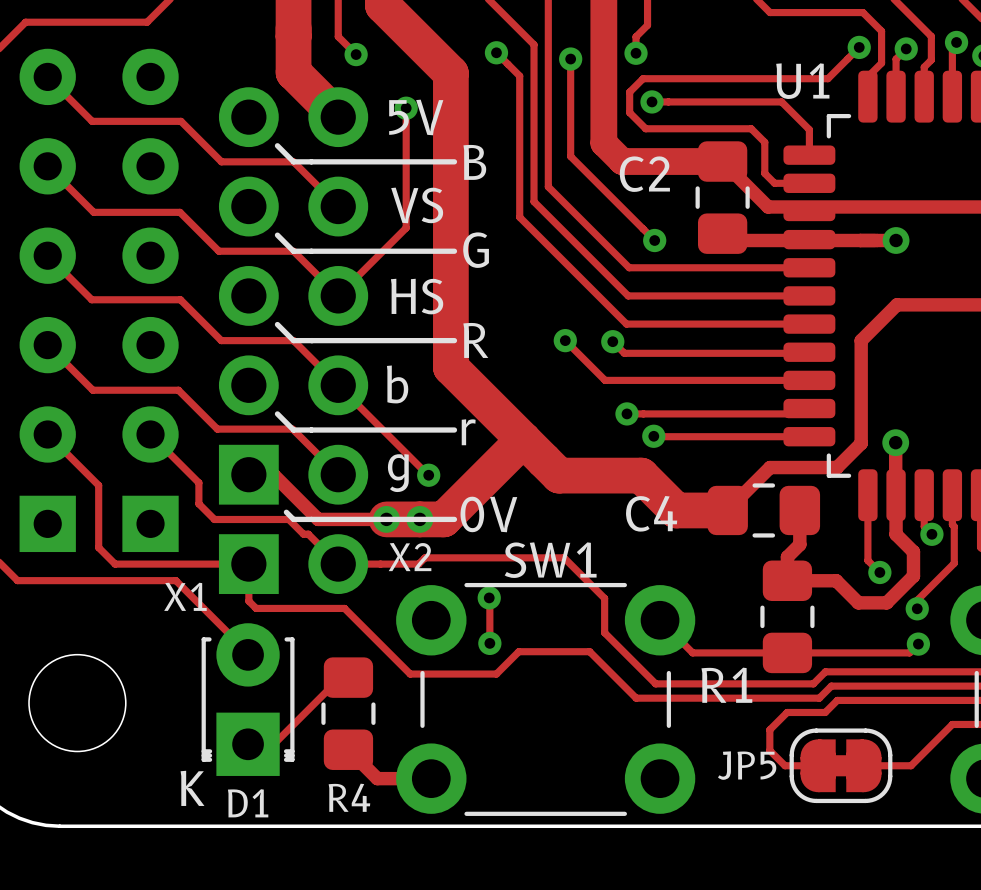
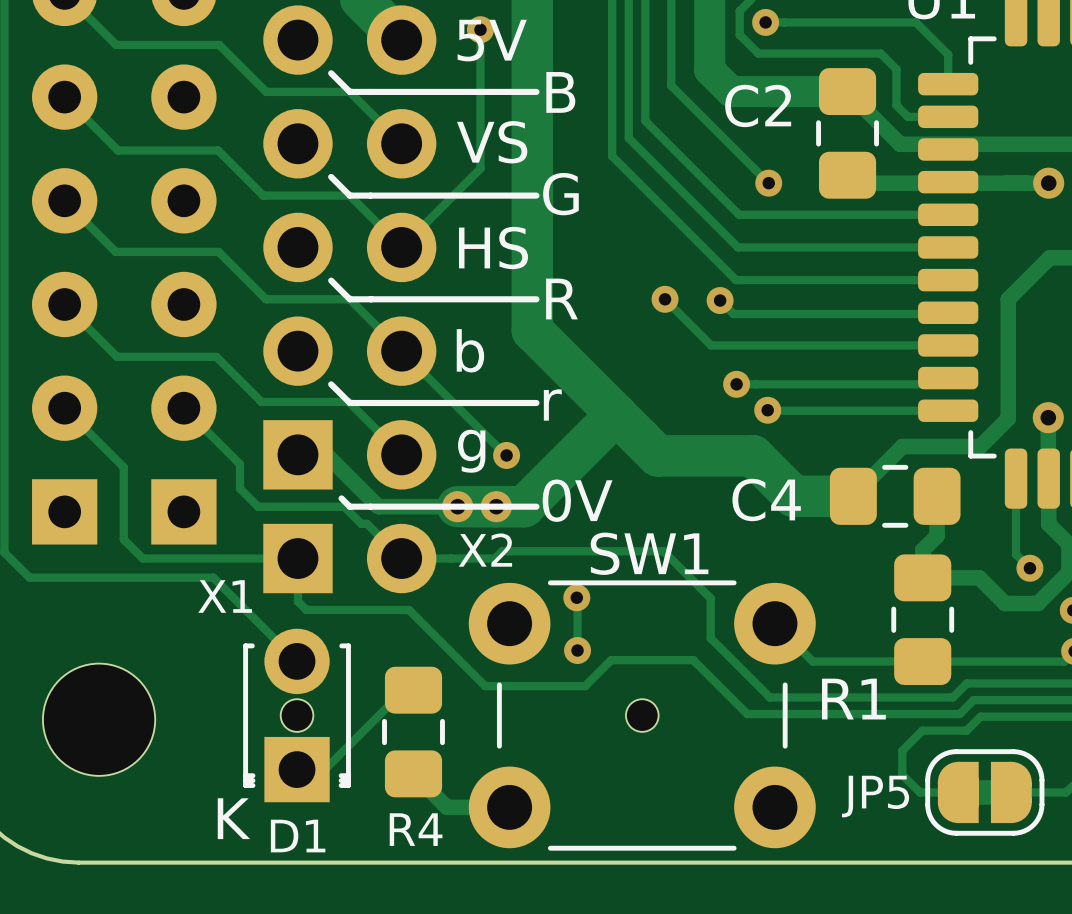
D1 footprint: [201, 623, 295, 776] -> [243, 628, 351, 803]
part: none -> (297, 715)
part: none -> (642, 715)

